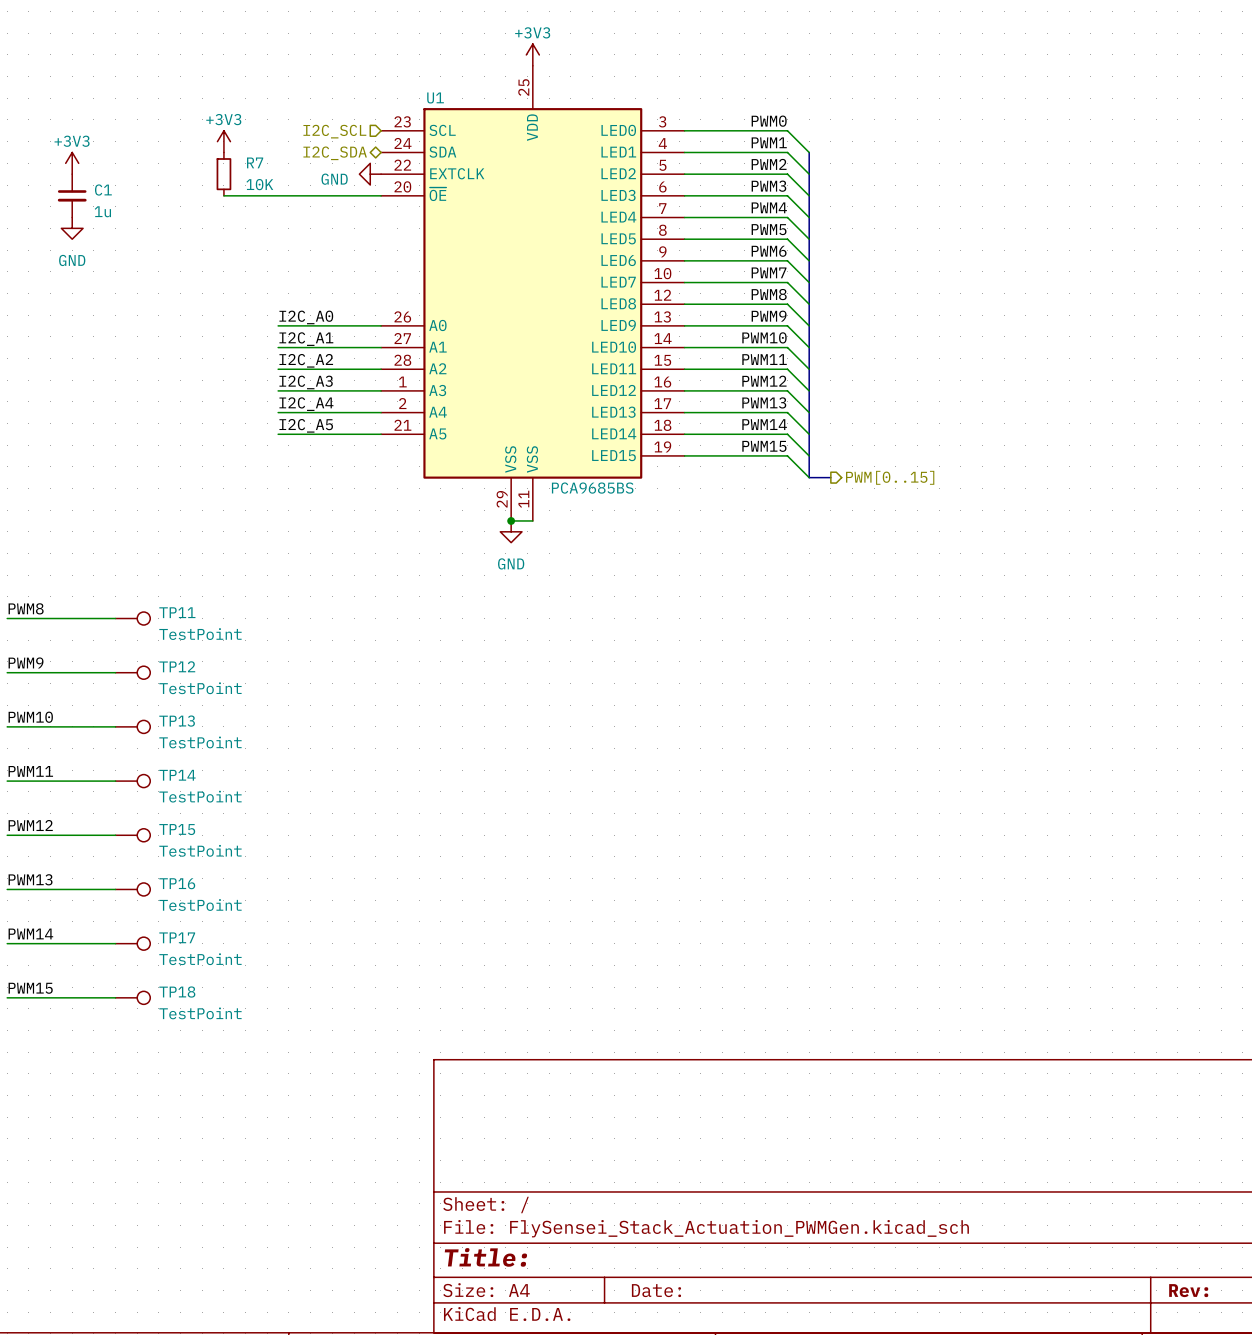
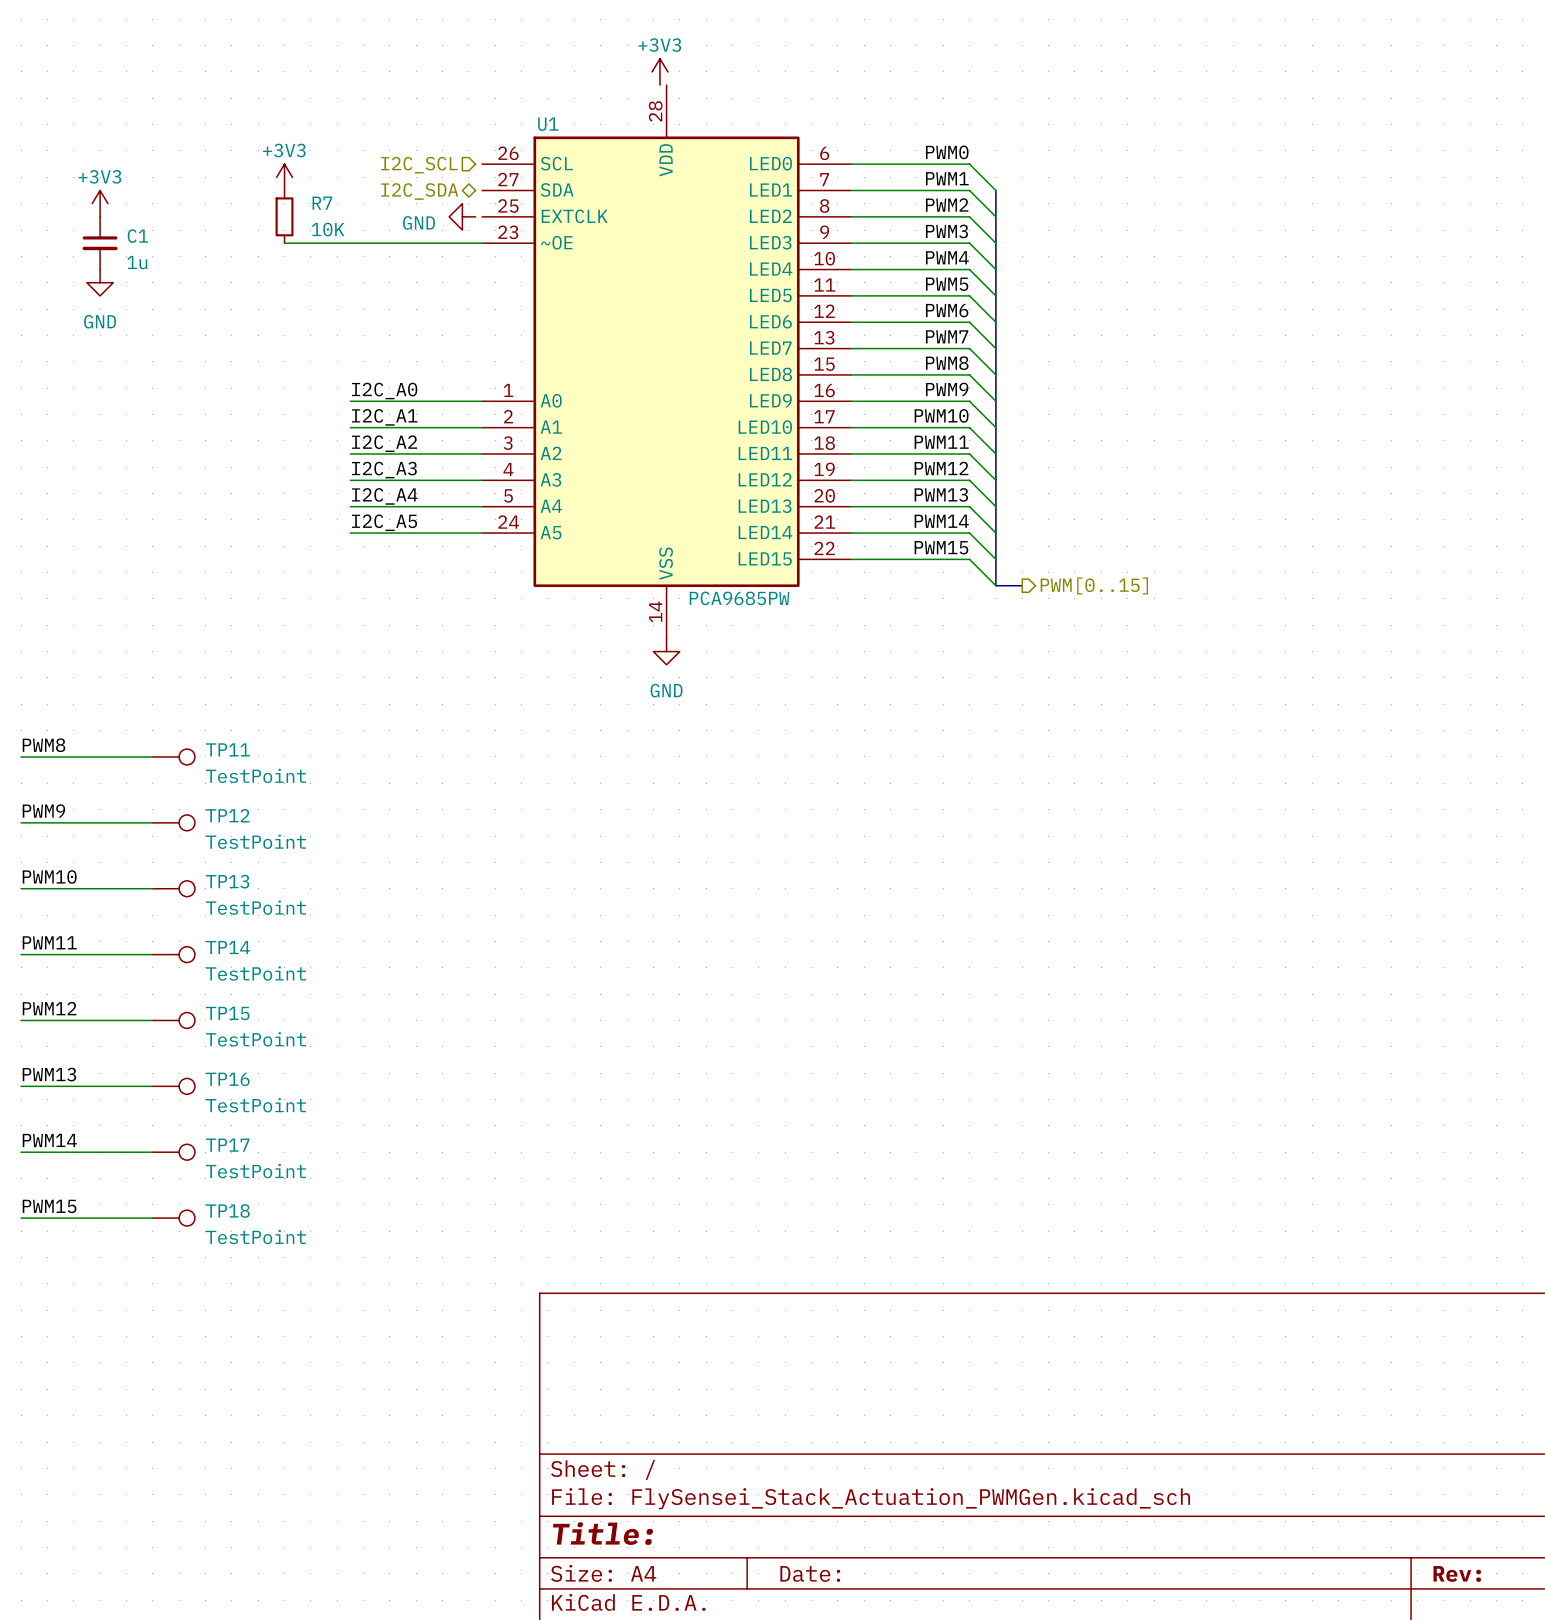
U1 symbol: [381, 65, 685, 521] -> [482, 85, 851, 639]
U1 value: PCA9685BS (592, 488) -> PCA9685PW (739, 598)
wire: (511, 520) (532, 520) -> none
junction: (511, 520) -> none
power symbol position: GND (511, 531) -> GND (666, 651)

